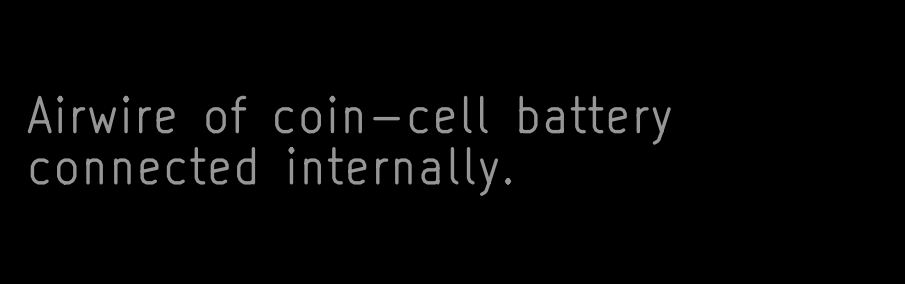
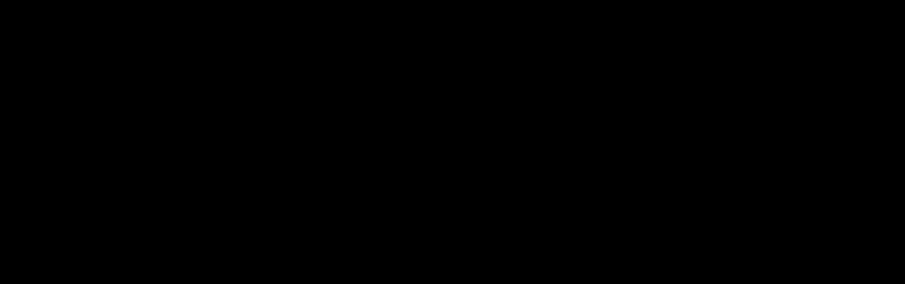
text: Airwire of coin-cell battery (349, 120) -> none
text: connected internally. (270, 171) -> none

